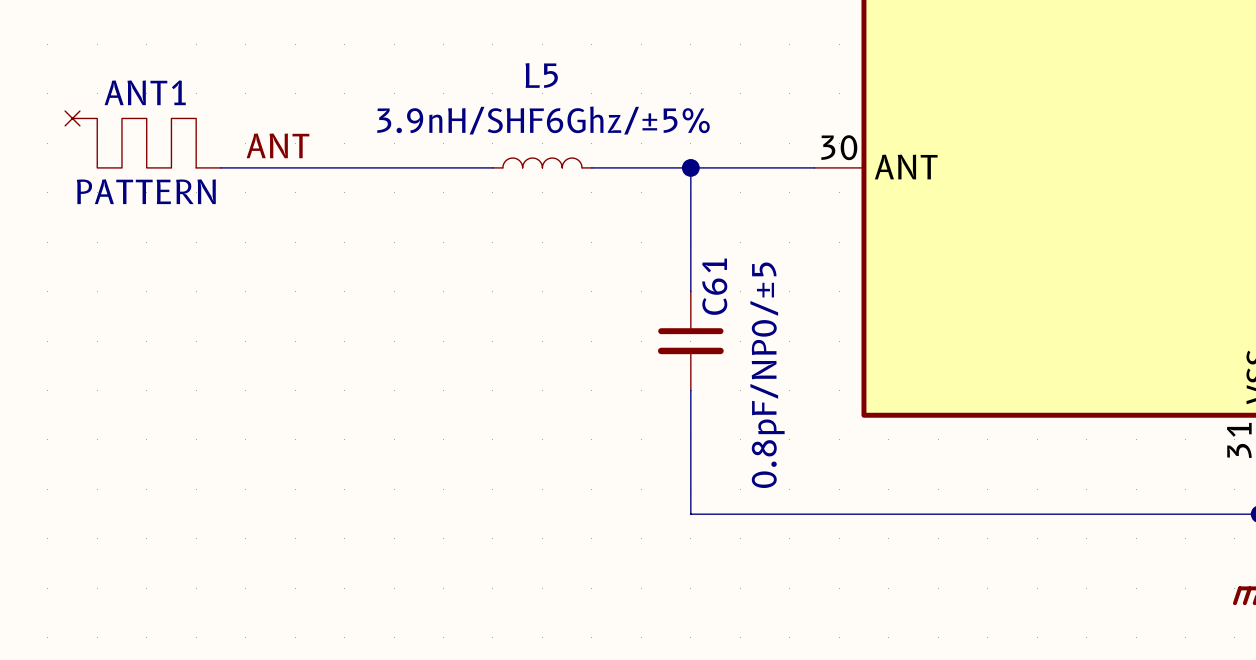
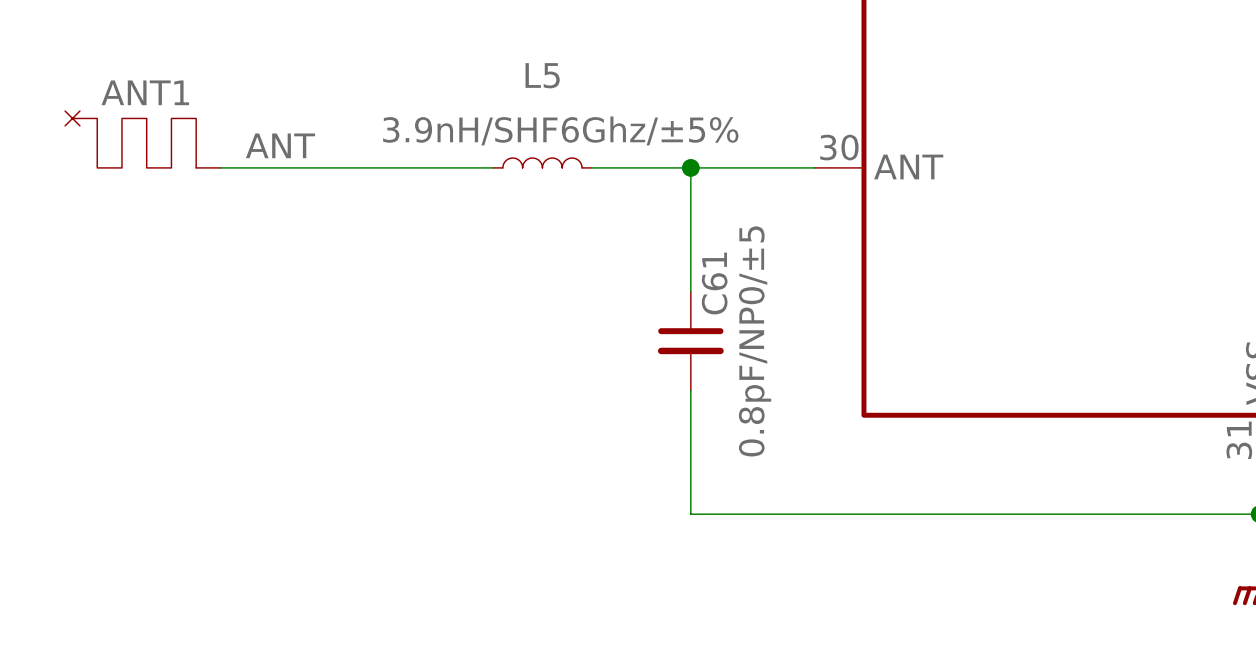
L5 text: 3.9nH/SHF6Ghz/±5% (543, 120) -> none
L5 text: none -> 3.9nH/SHF6Ghz/±5% (560, 130)
ANT1 text: PATTERN (146, 191) -> none
C61 text: none -> 0.8pF/NP0/±5 (755, 341)
C61 text: 0.8pF/NP0/±5 (767, 375) -> none

